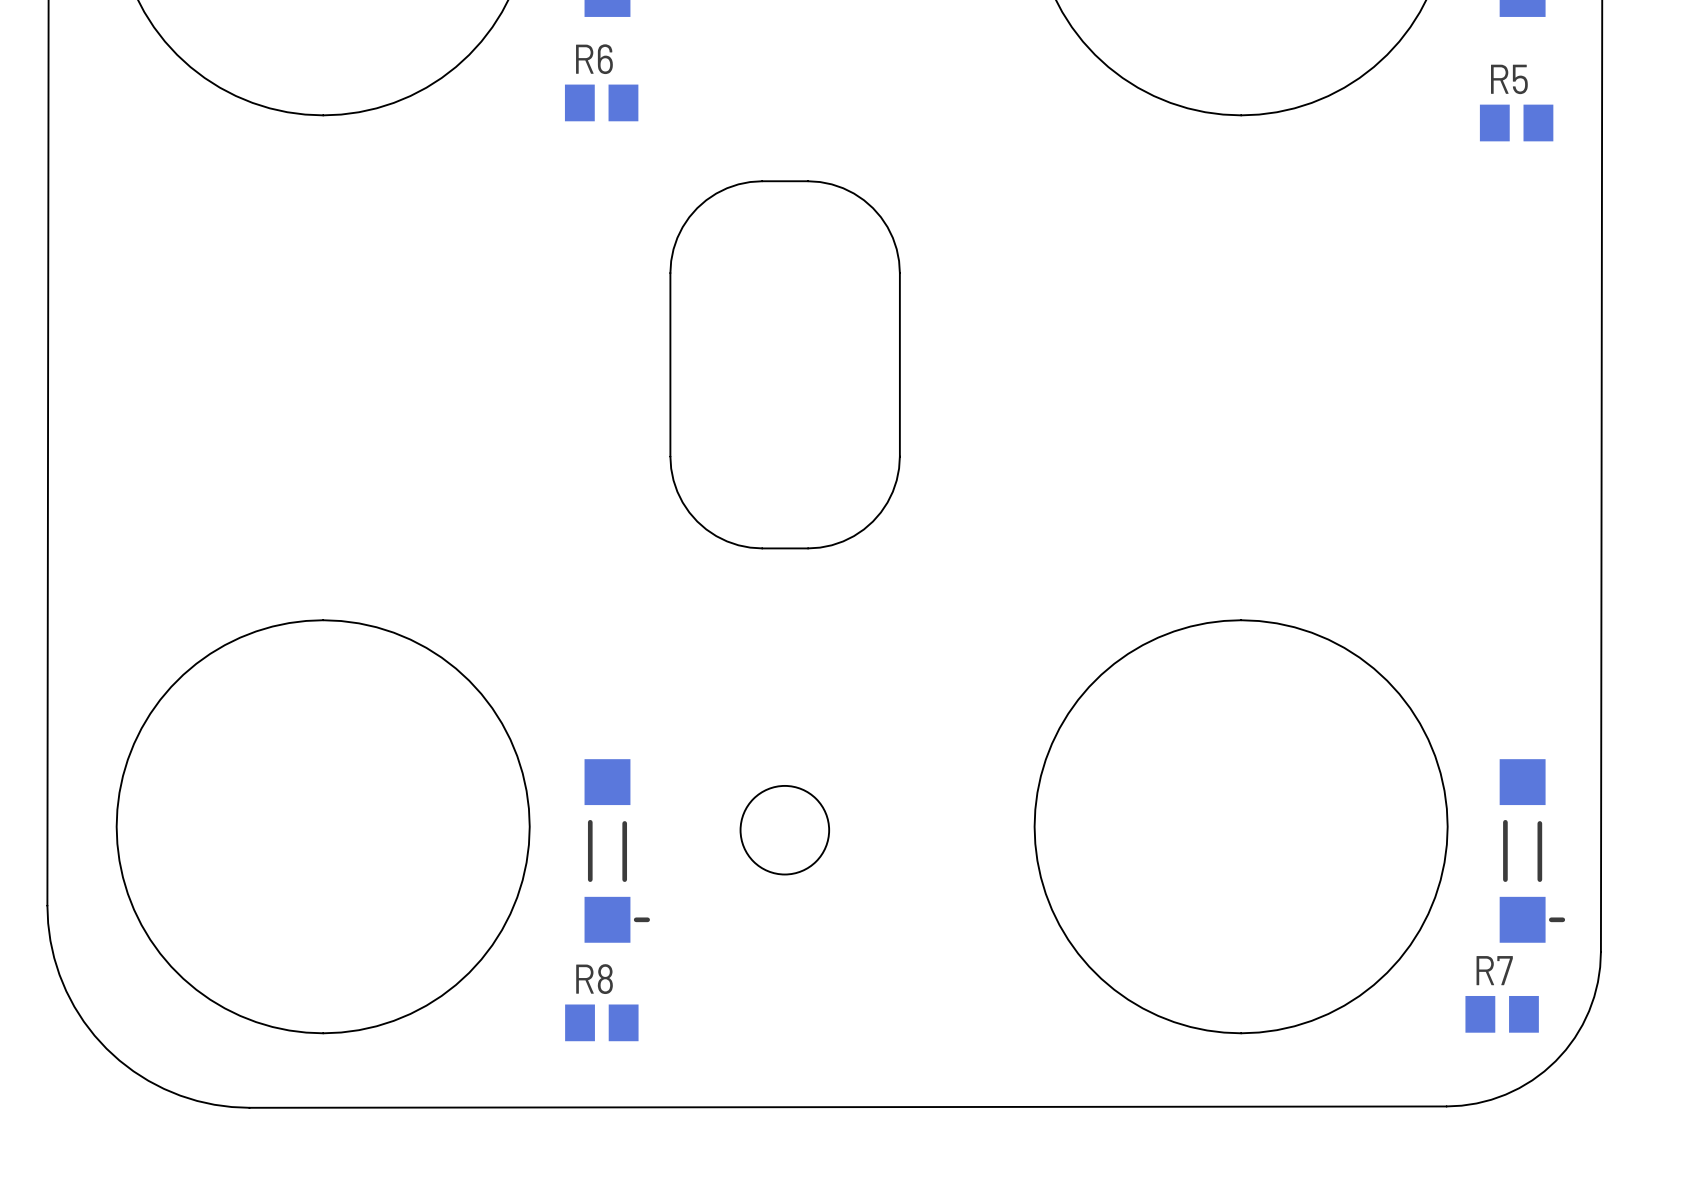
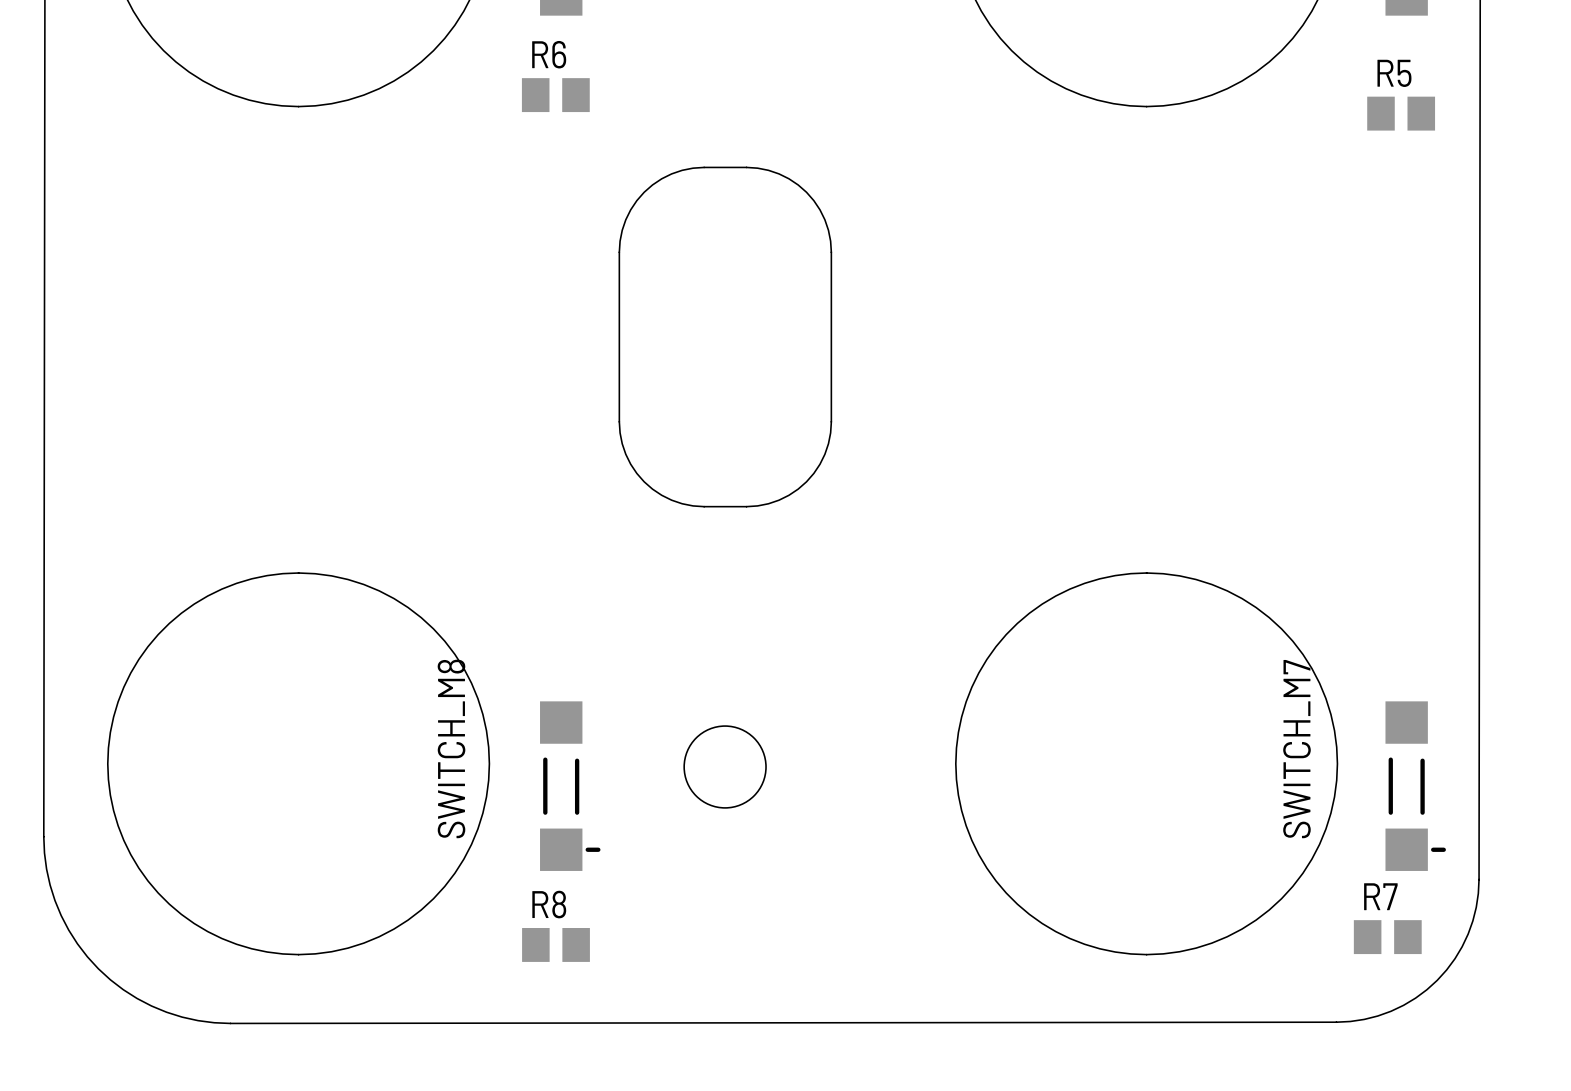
SWITCH_M8 name: none -> SWITCH_M8 (451, 748)
SWITCH_M7 name: none -> SWITCH_M7 (1296, 749)

